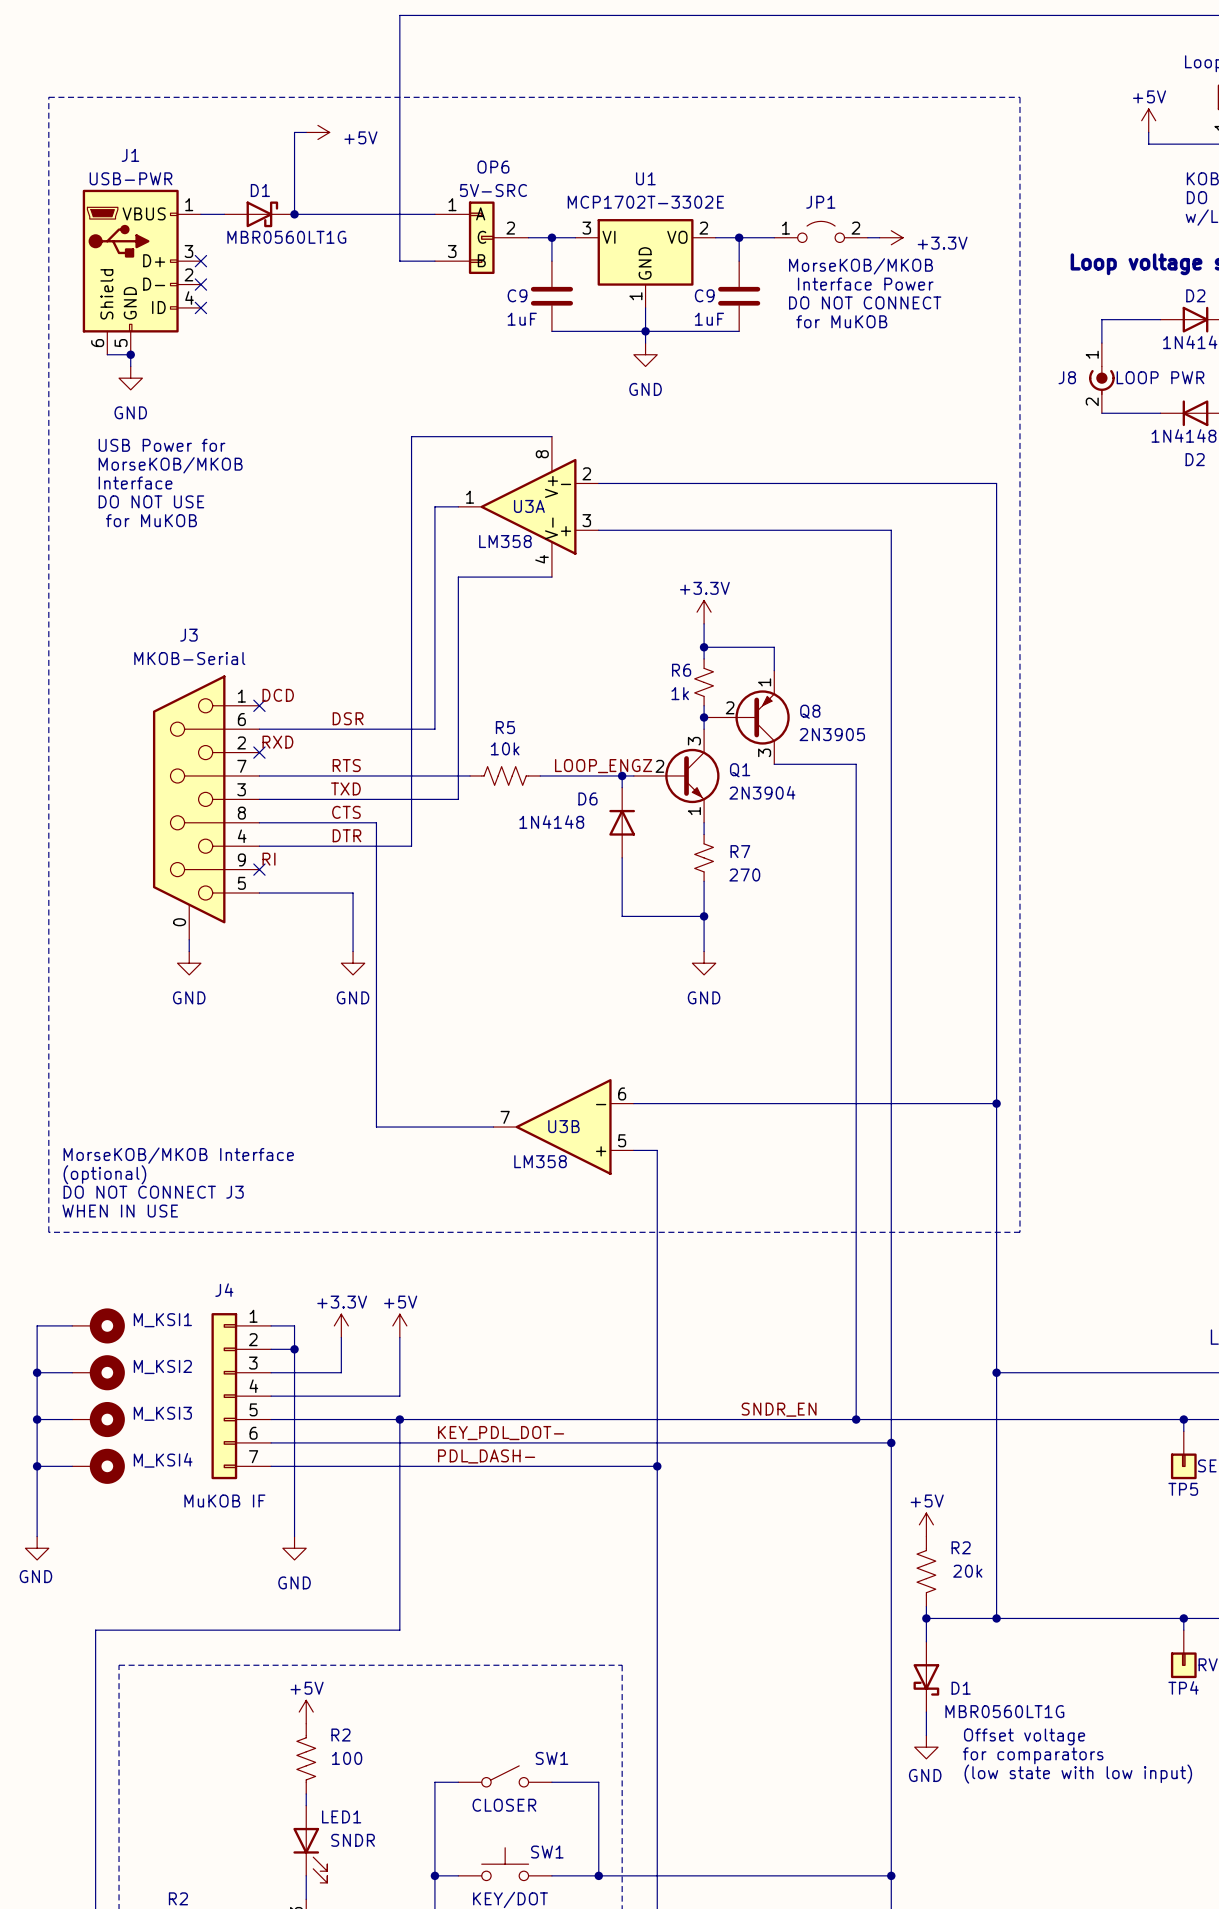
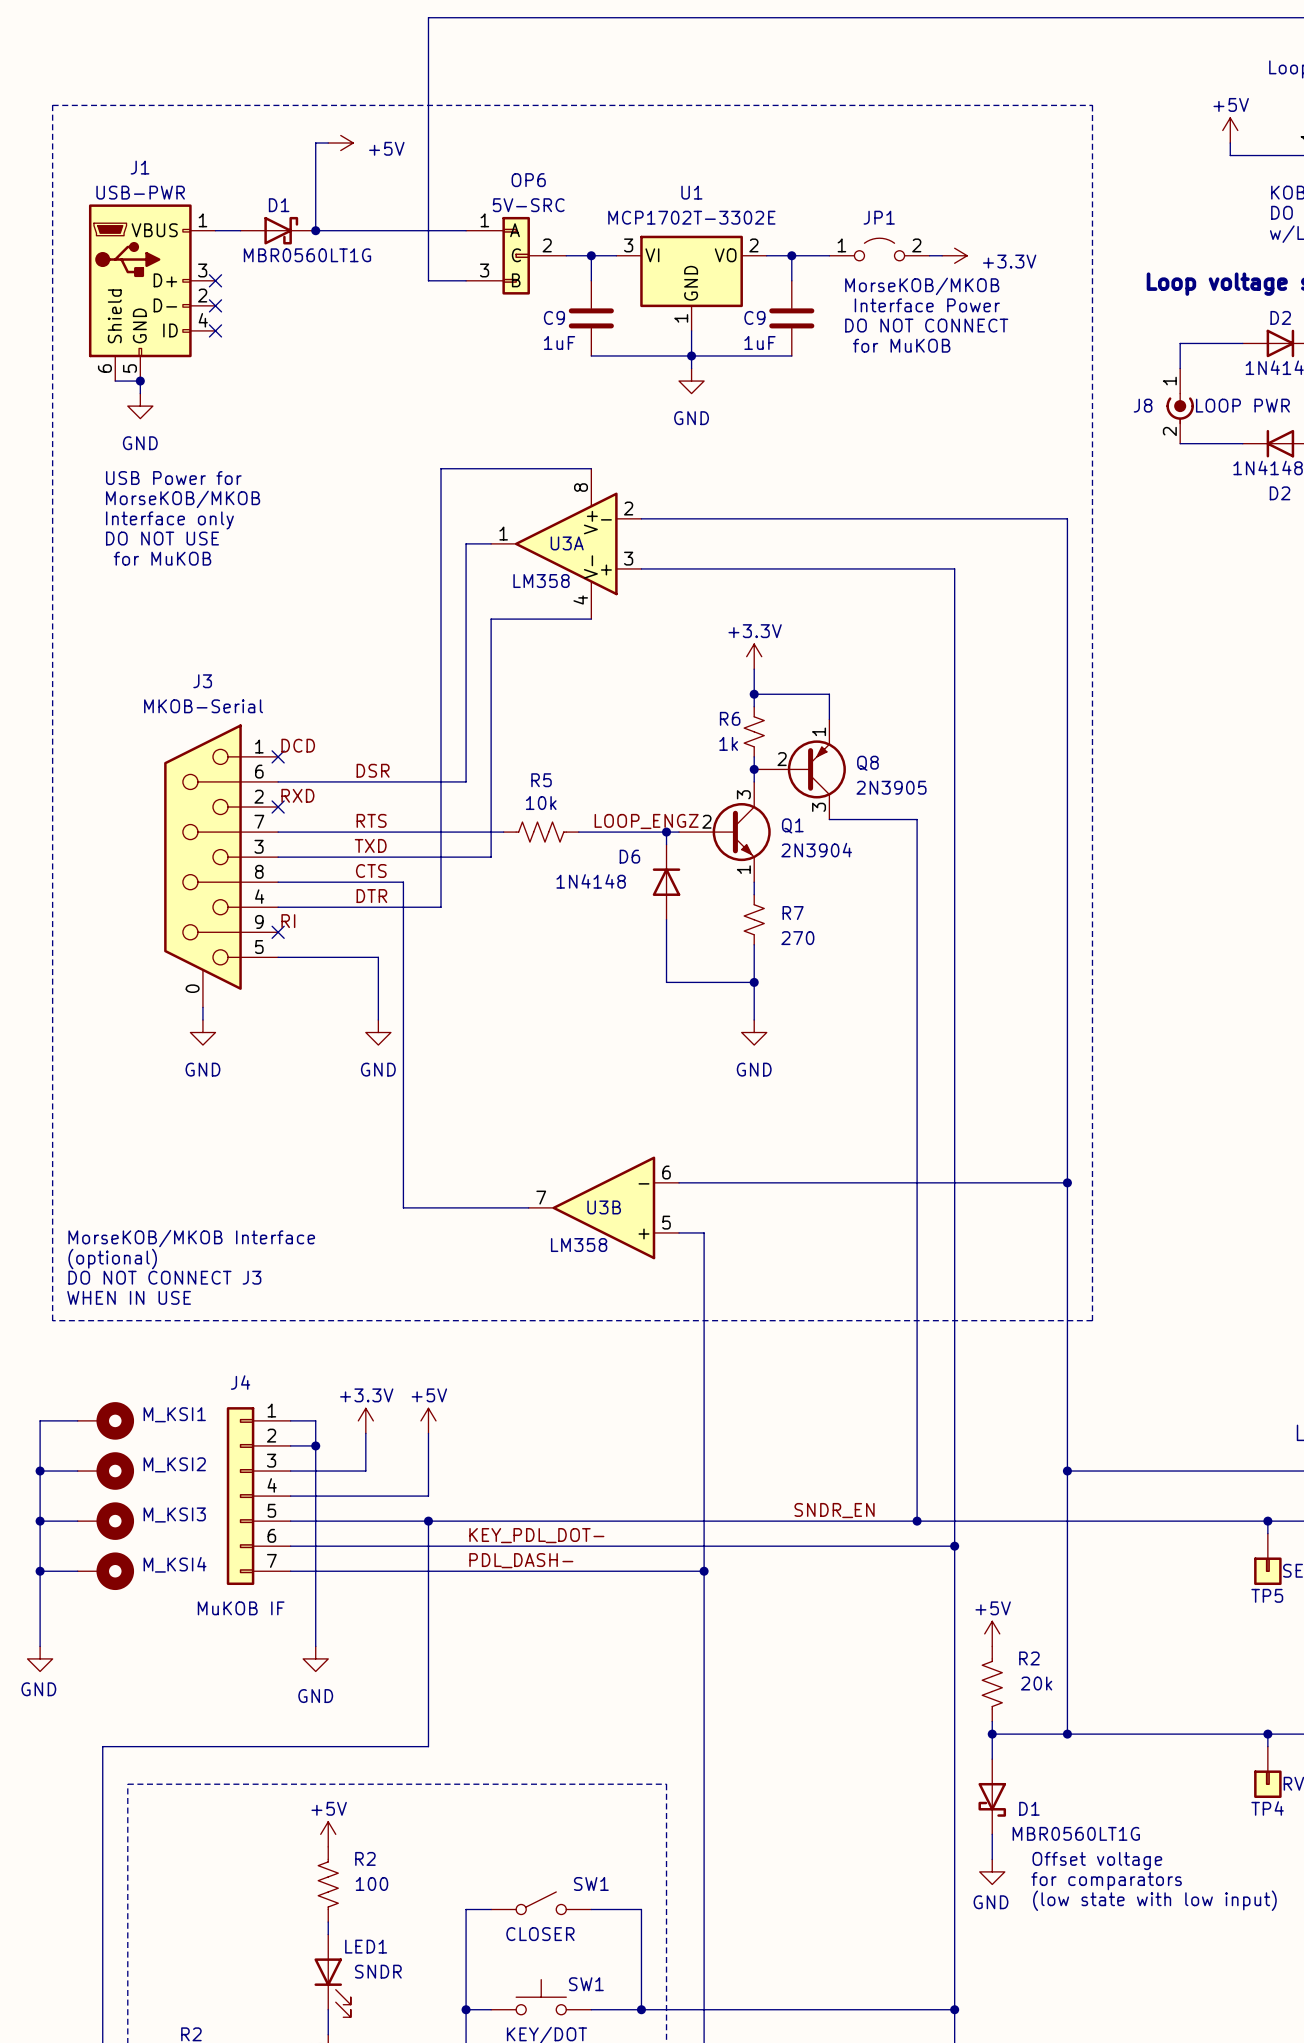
text: Interface (135, 483) -> Interface only (169, 520)

